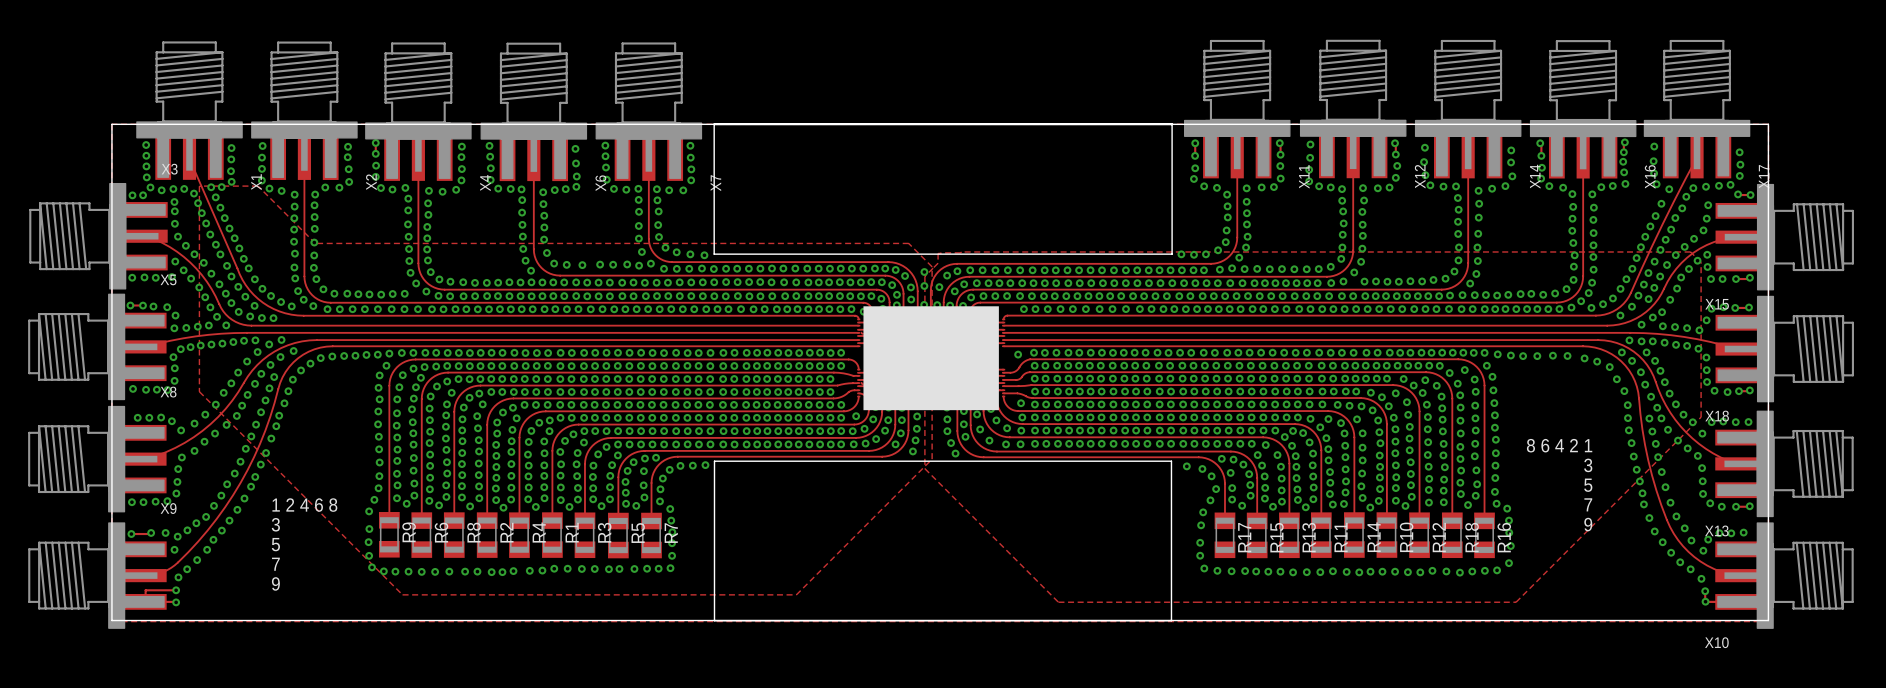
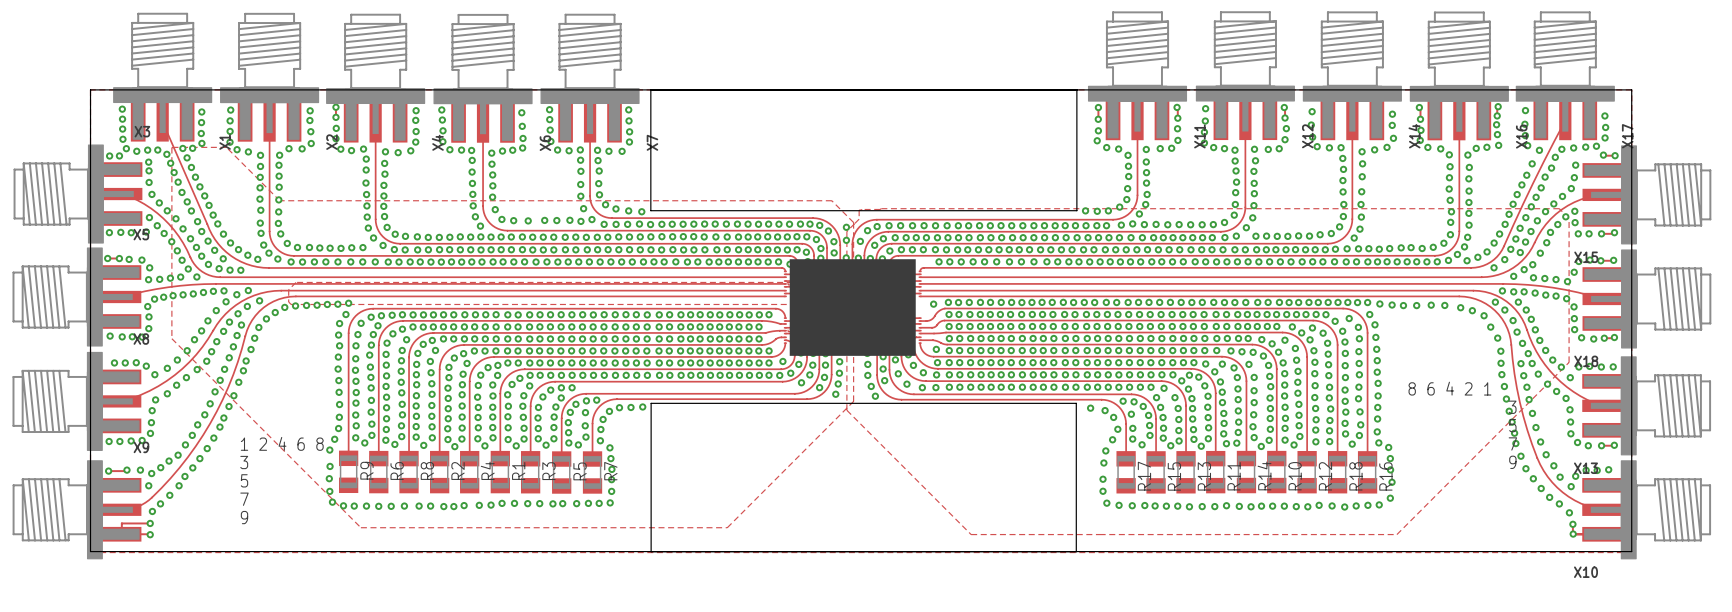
zone outline: none -> (296, 282) (792, 282) (795, 284) (795, 304) (291, 304) (288, 302) (288, 289) (296, 282)
via: (401, 352) -> none
via: (413, 352) -> none
via: (425, 352) -> none
via: (436, 352) -> none
via: (447, 352) -> none
via: (458, 352) -> none
via: (480, 352) -> none
via: (491, 352) -> none
via: (502, 352) -> none
via: (514, 352) -> none
via: (560, 352) -> none
via: (571, 352) -> none
via: (584, 352) -> none
via: (595, 352) -> none
via: (606, 352) -> none
via: (617, 352) -> none
via: (629, 352) -> none
via: (641, 352) -> none
via: (652, 352) -> none
via: (676, 352) -> none
via: (710, 352) -> none
via: (723, 352) -> none
via: (734, 352) -> none
via: (746, 352) -> none
via: (757, 352) -> none
via: (767, 352) -> none
via: (778, 352) -> none
via: (788, 352) -> none
via: (799, 352) -> none
via: (809, 352) -> none
via: (820, 352) -> none
via: (841, 352) -> none
via: (469, 353) -> none
via: (525, 353) -> none
via: (536, 353) -> none
via: (548, 353) -> none
via: (664, 353) -> none
via: (687, 353) -> none
via: (698, 353) -> none
via: (830, 353) -> none
via: (865, 443) -> none
via: (641, 444) -> none
via: (652, 444) -> none
via: (664, 444) -> none
via: (676, 444) -> none
via: (687, 444) -> none
via: (698, 444) -> none
via: (710, 444) -> none
via: (723, 444) -> none
via: (734, 444) -> none
via: (746, 444) -> none
via: (757, 444) -> none
via: (767, 444) -> none
via: (778, 444) -> none
via: (788, 444) -> none
via: (798, 444) -> none
via: (809, 444) -> none
via: (820, 444) -> none
via: (830, 444) -> none
via: (841, 444) -> none
via: (853, 444) -> none

